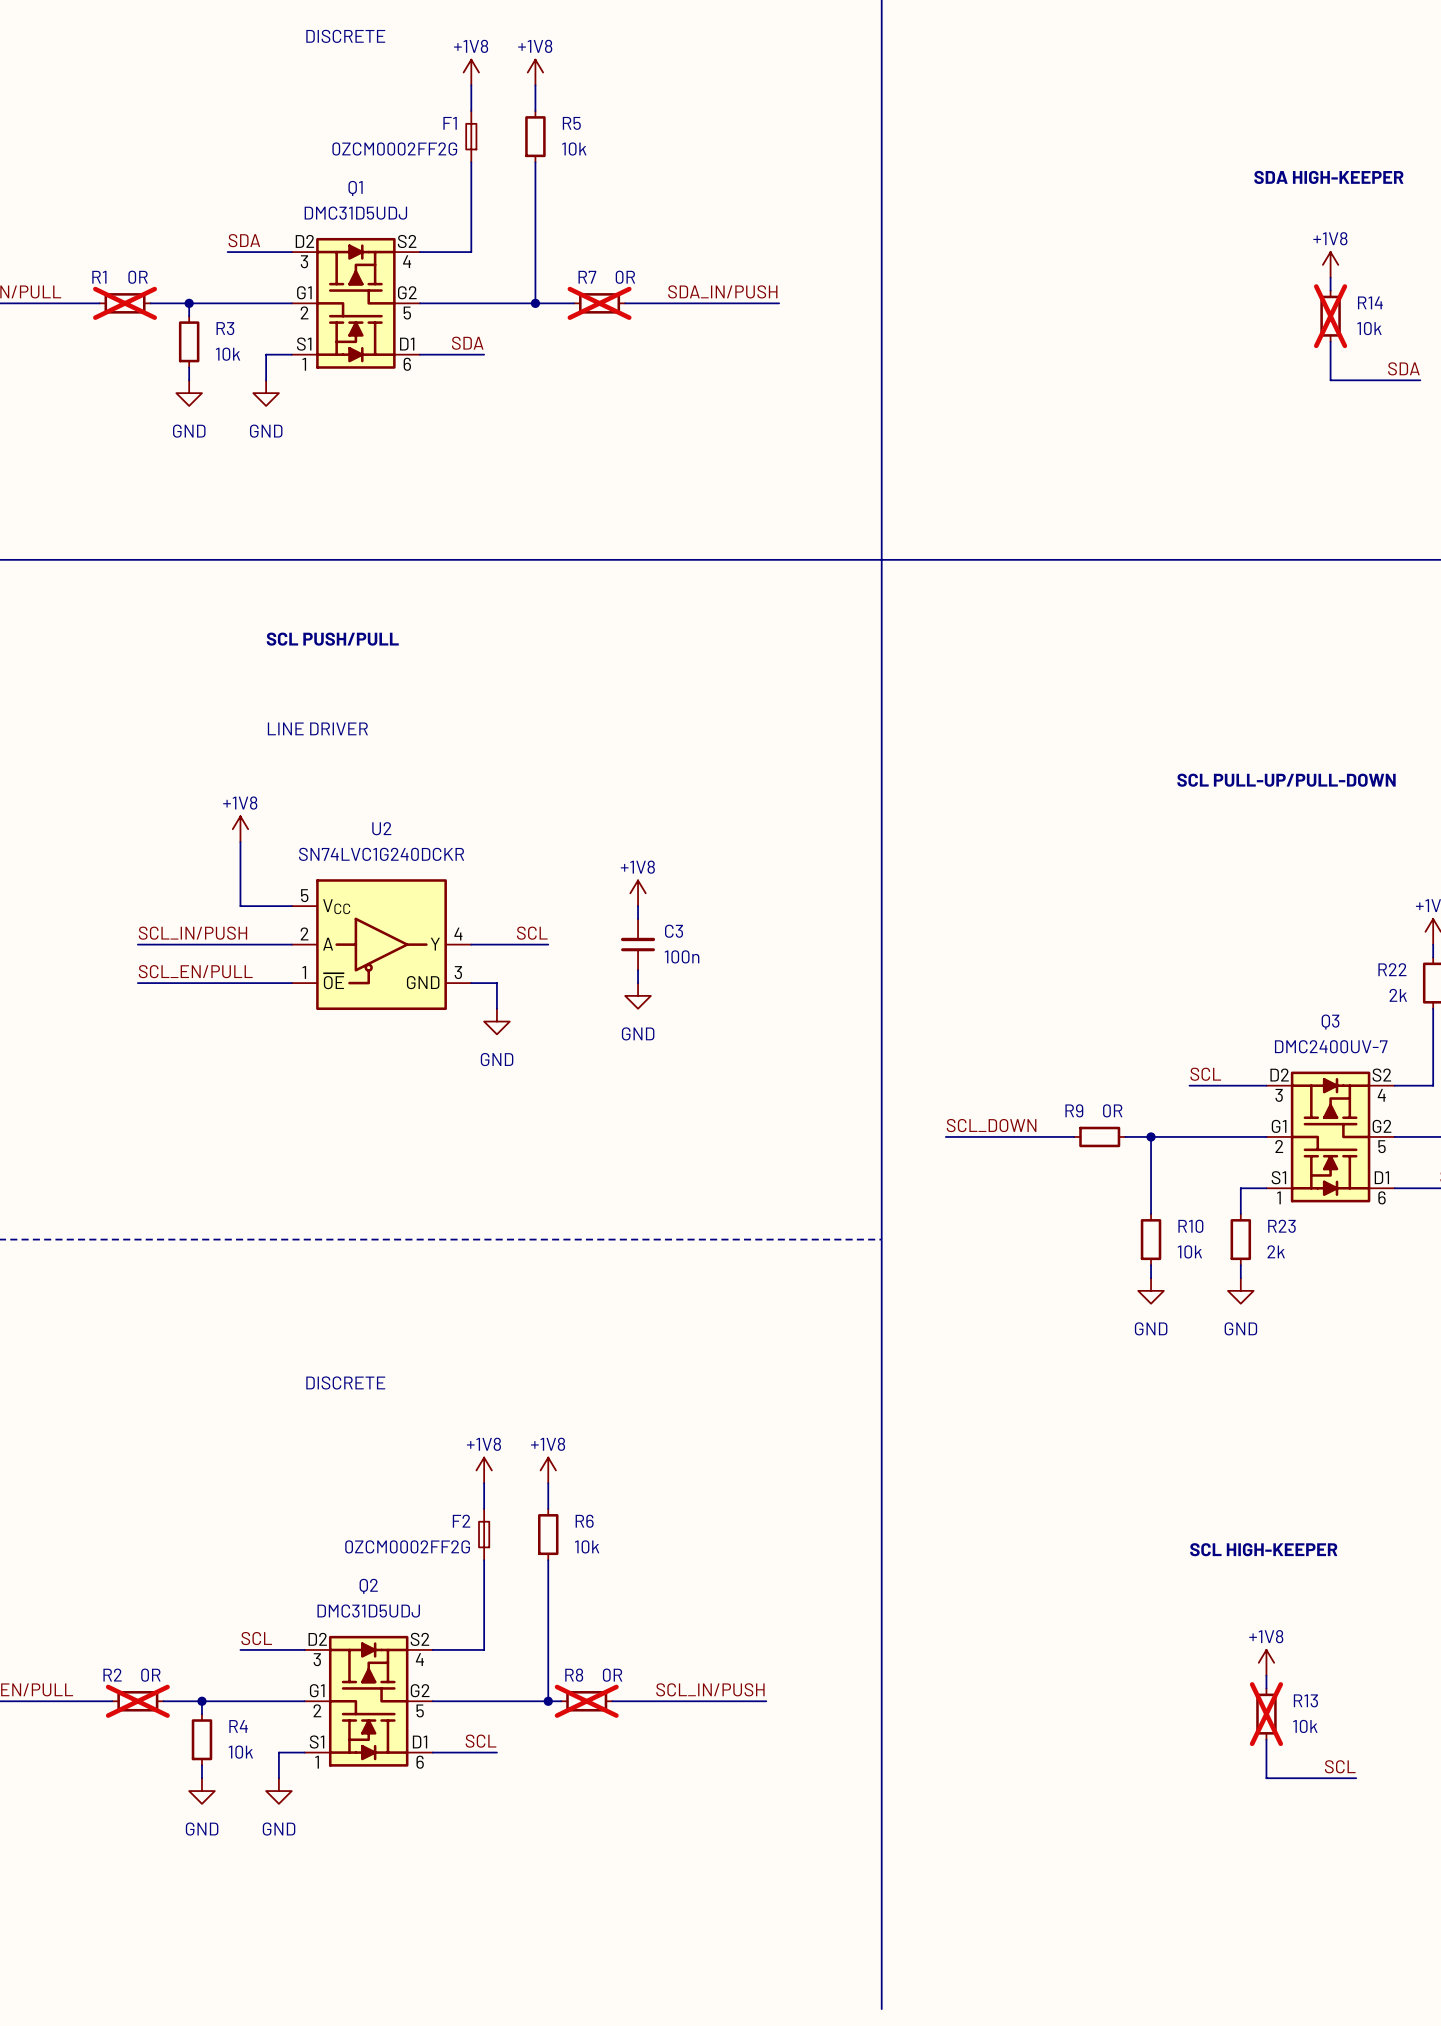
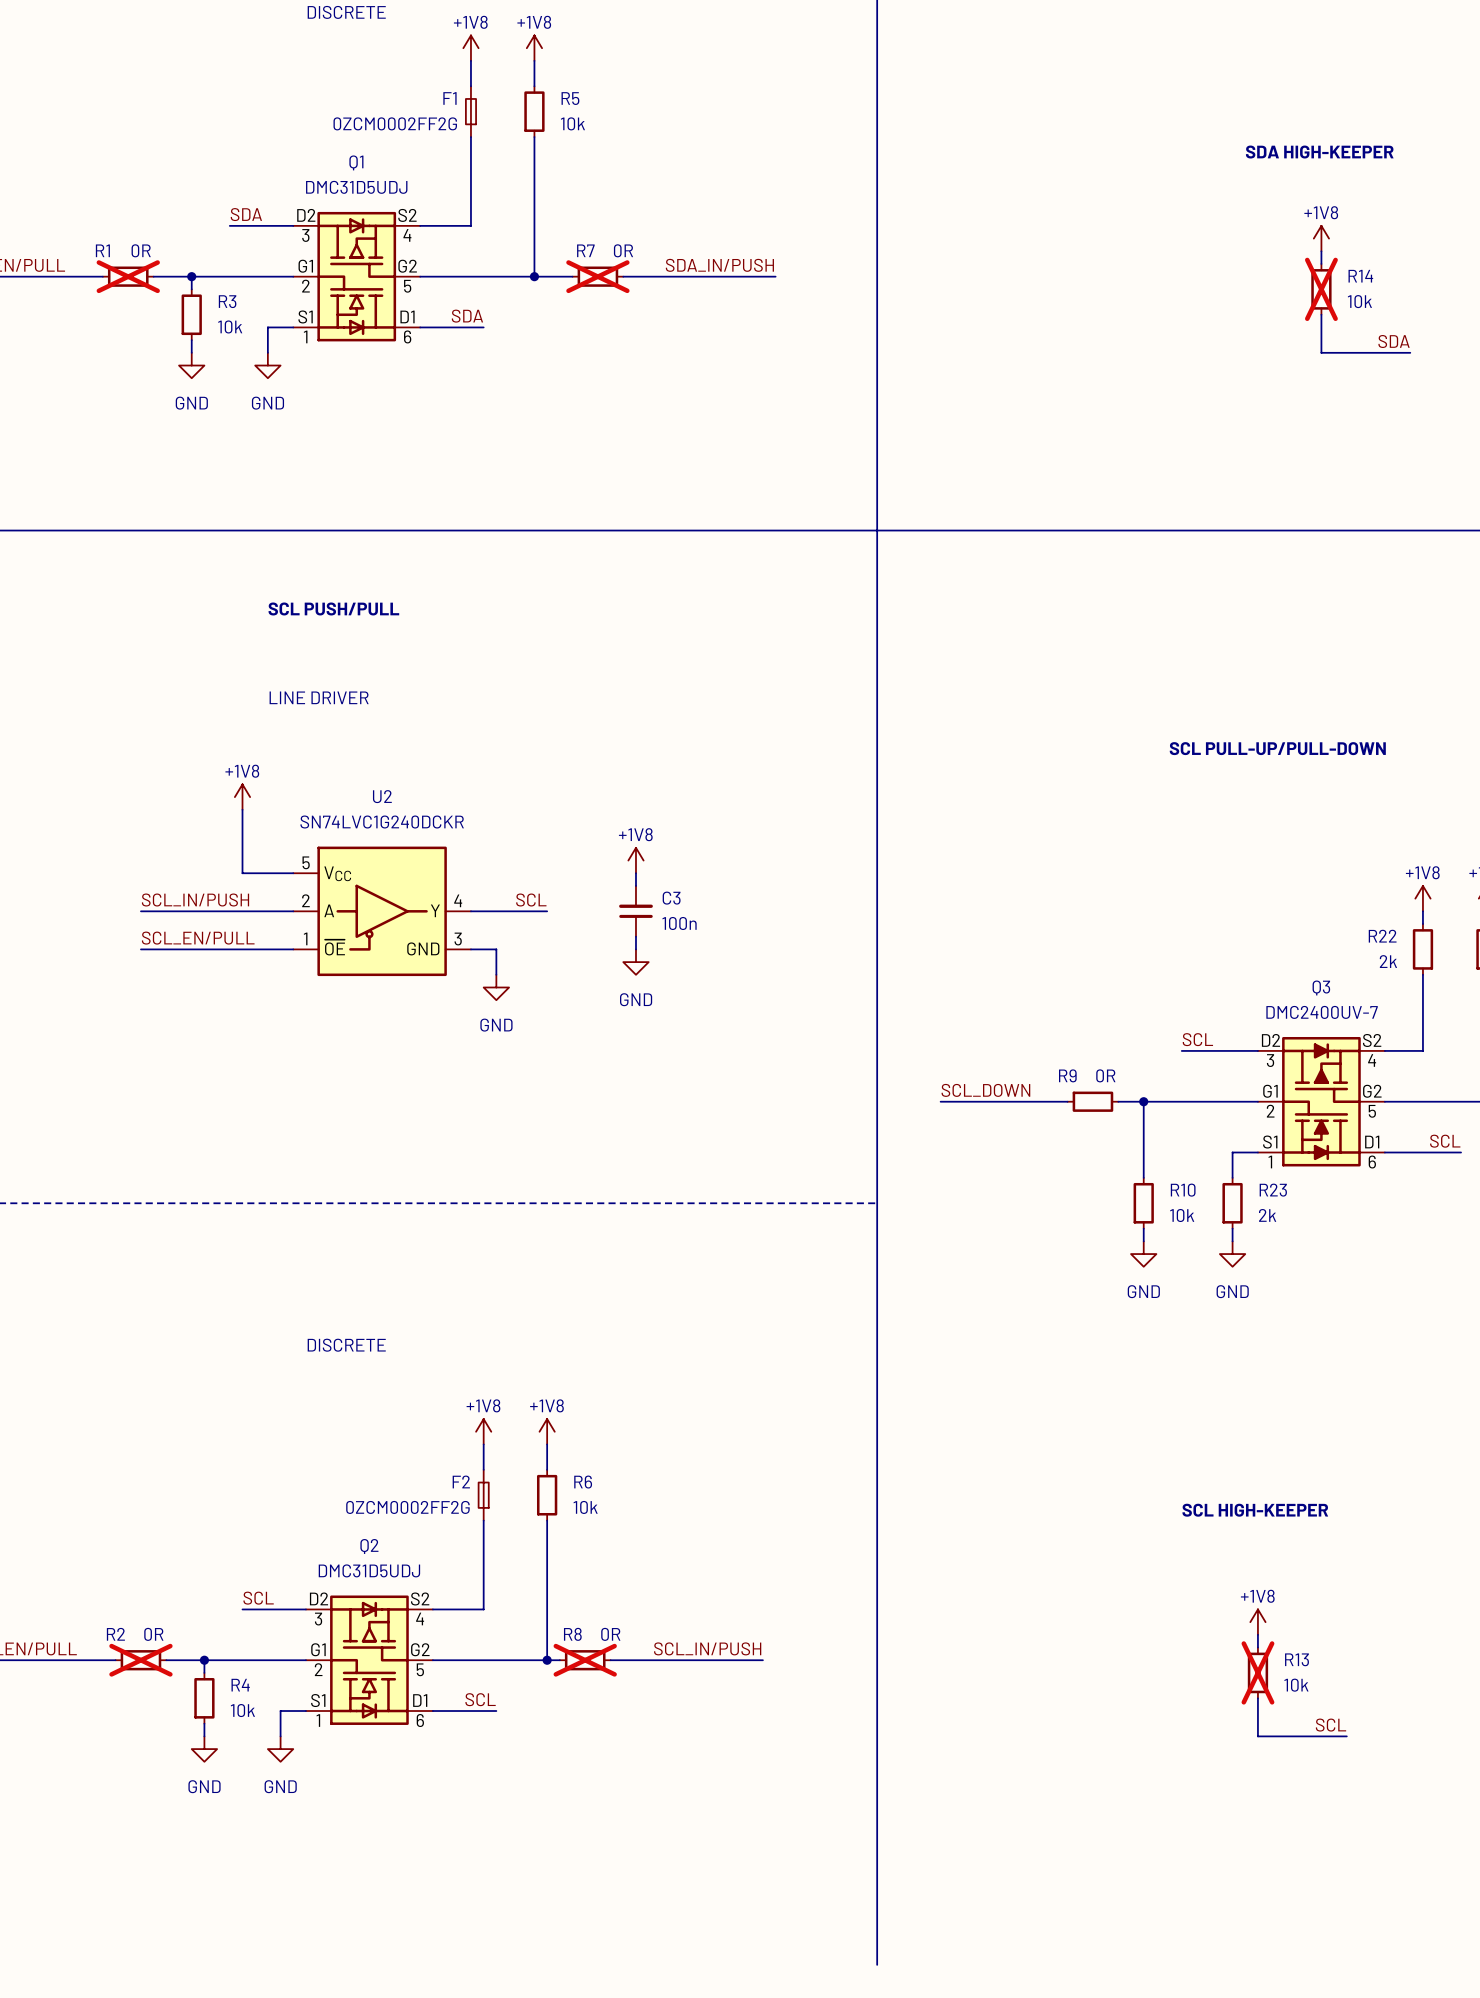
Q1 symbol: [291, 237, 421, 369] -> [293, 211, 421, 342]
Q2 symbol: [304, 1635, 433, 1767] -> [305, 1595, 433, 1725]

